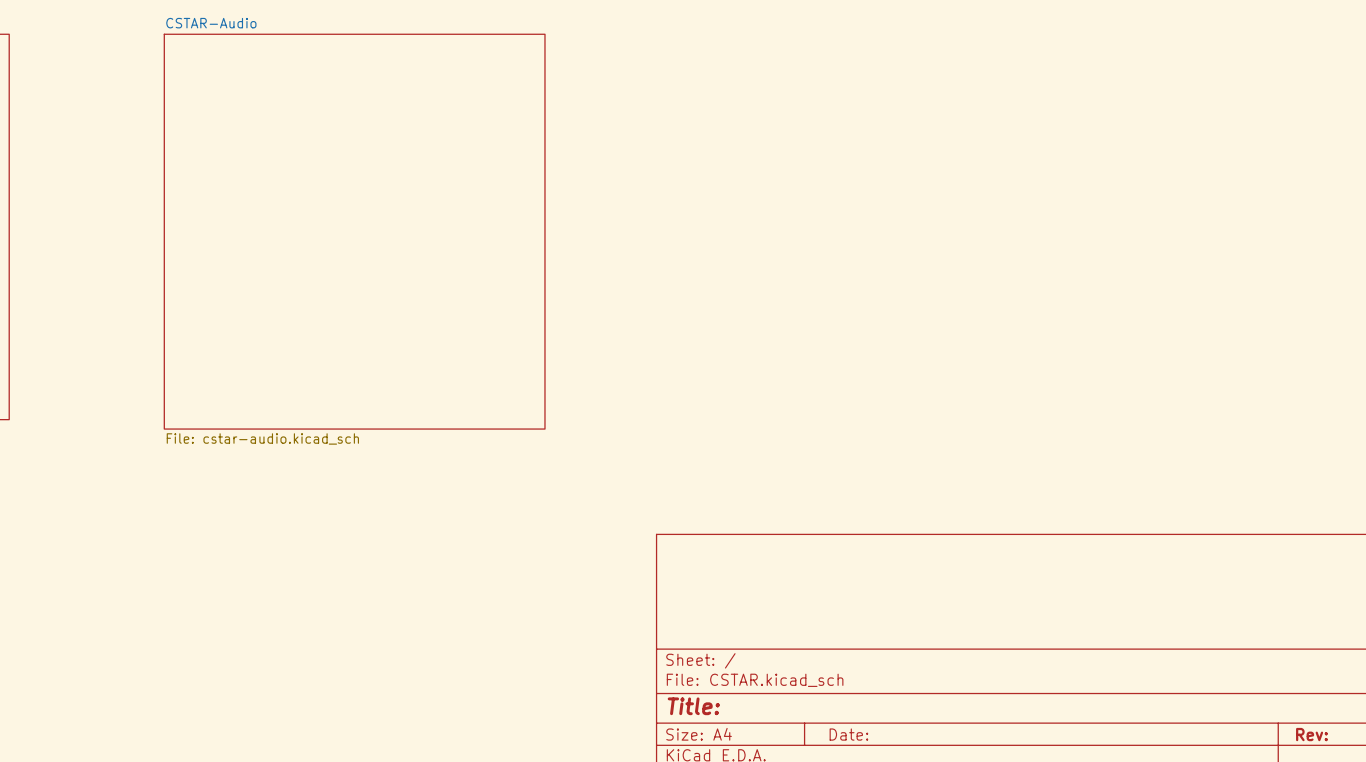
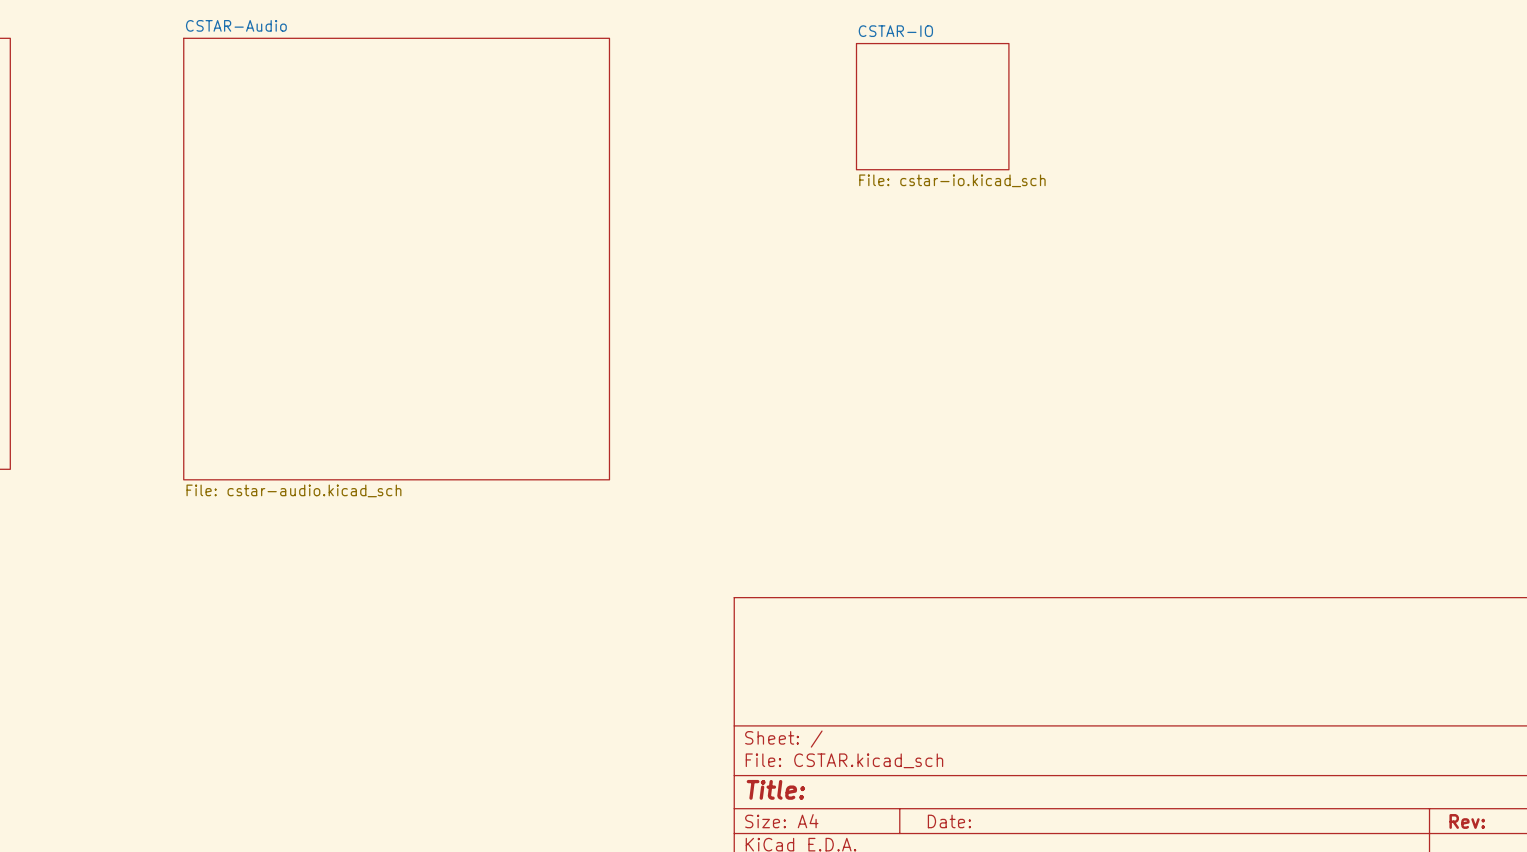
sheet CSTAR-IO: none -> File: cstar-io.kicad_sch (932, 106)

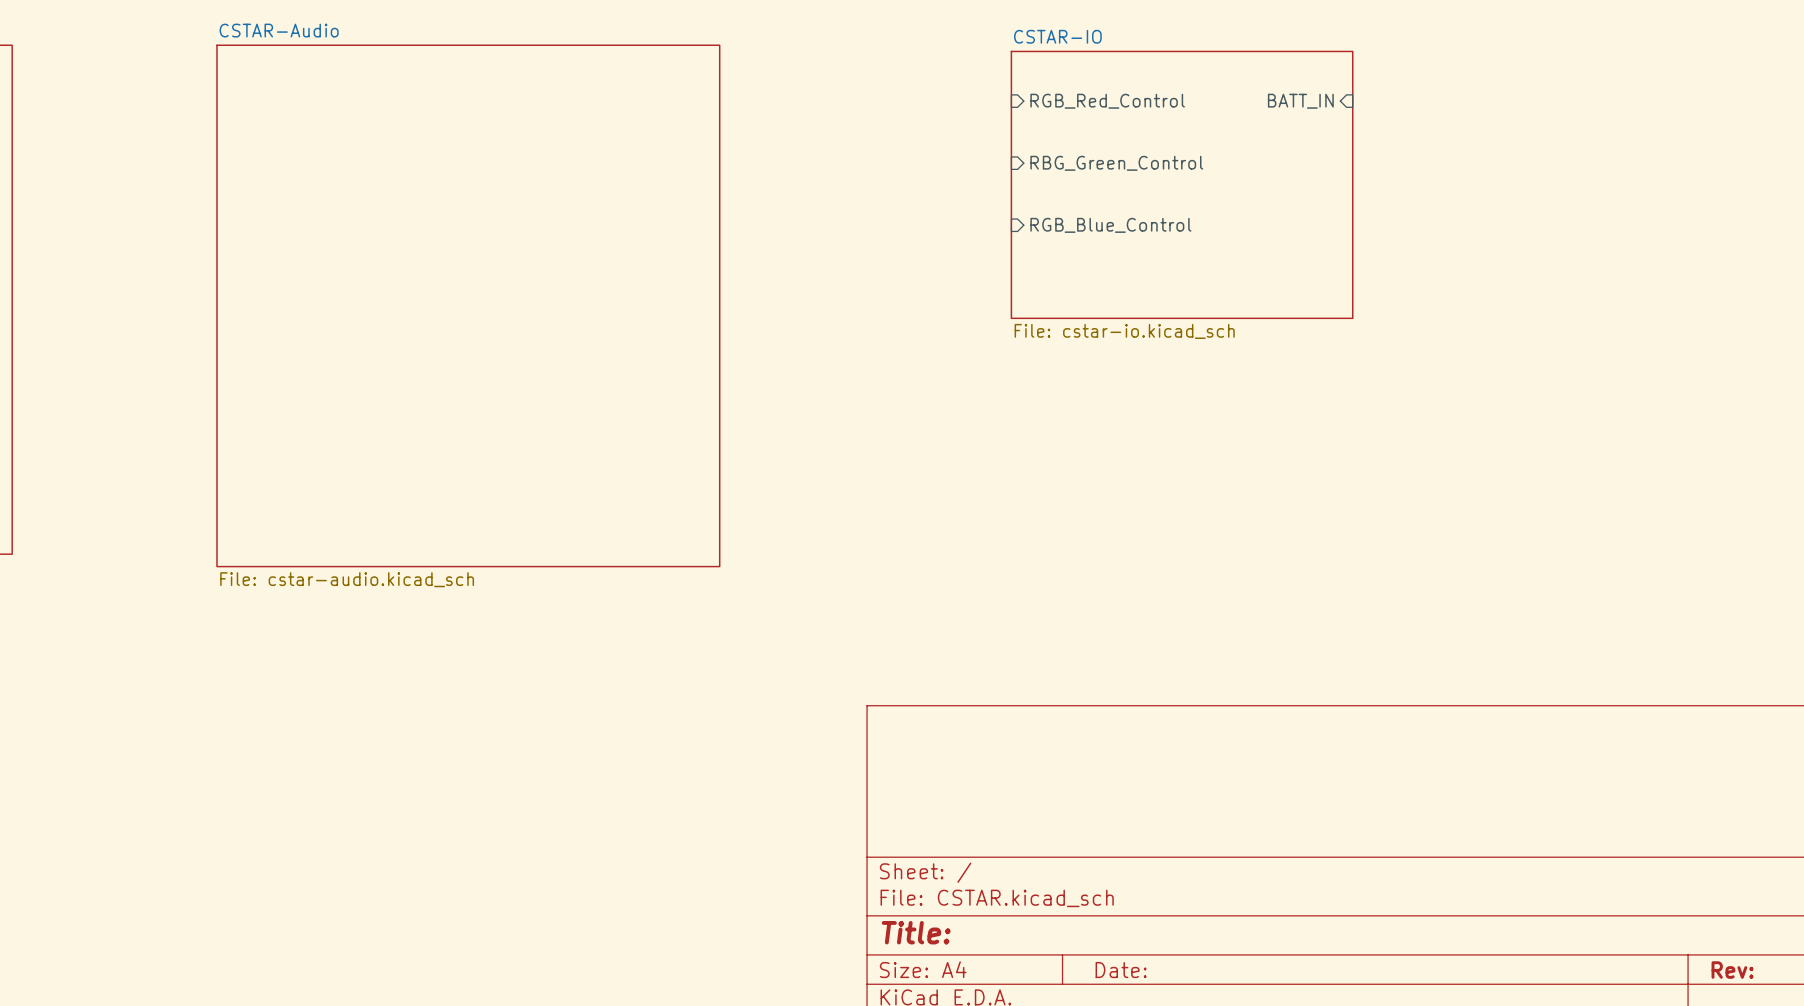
sheet pin: none -> RGB_Red_Control (1107, 101)
sheet pin: none -> BATT_IN (1300, 101)
sheet CSTAR-IO: File: cstar-io.kicad_sch (932, 106) -> none
sheet pin: none -> RBG_Green_Control (1116, 163)
sheet CSTAR-IO: none -> File: cstar-io.kicad_sch (1182, 184)
sheet pin: none -> RGB_Blue_Control (1110, 225)

